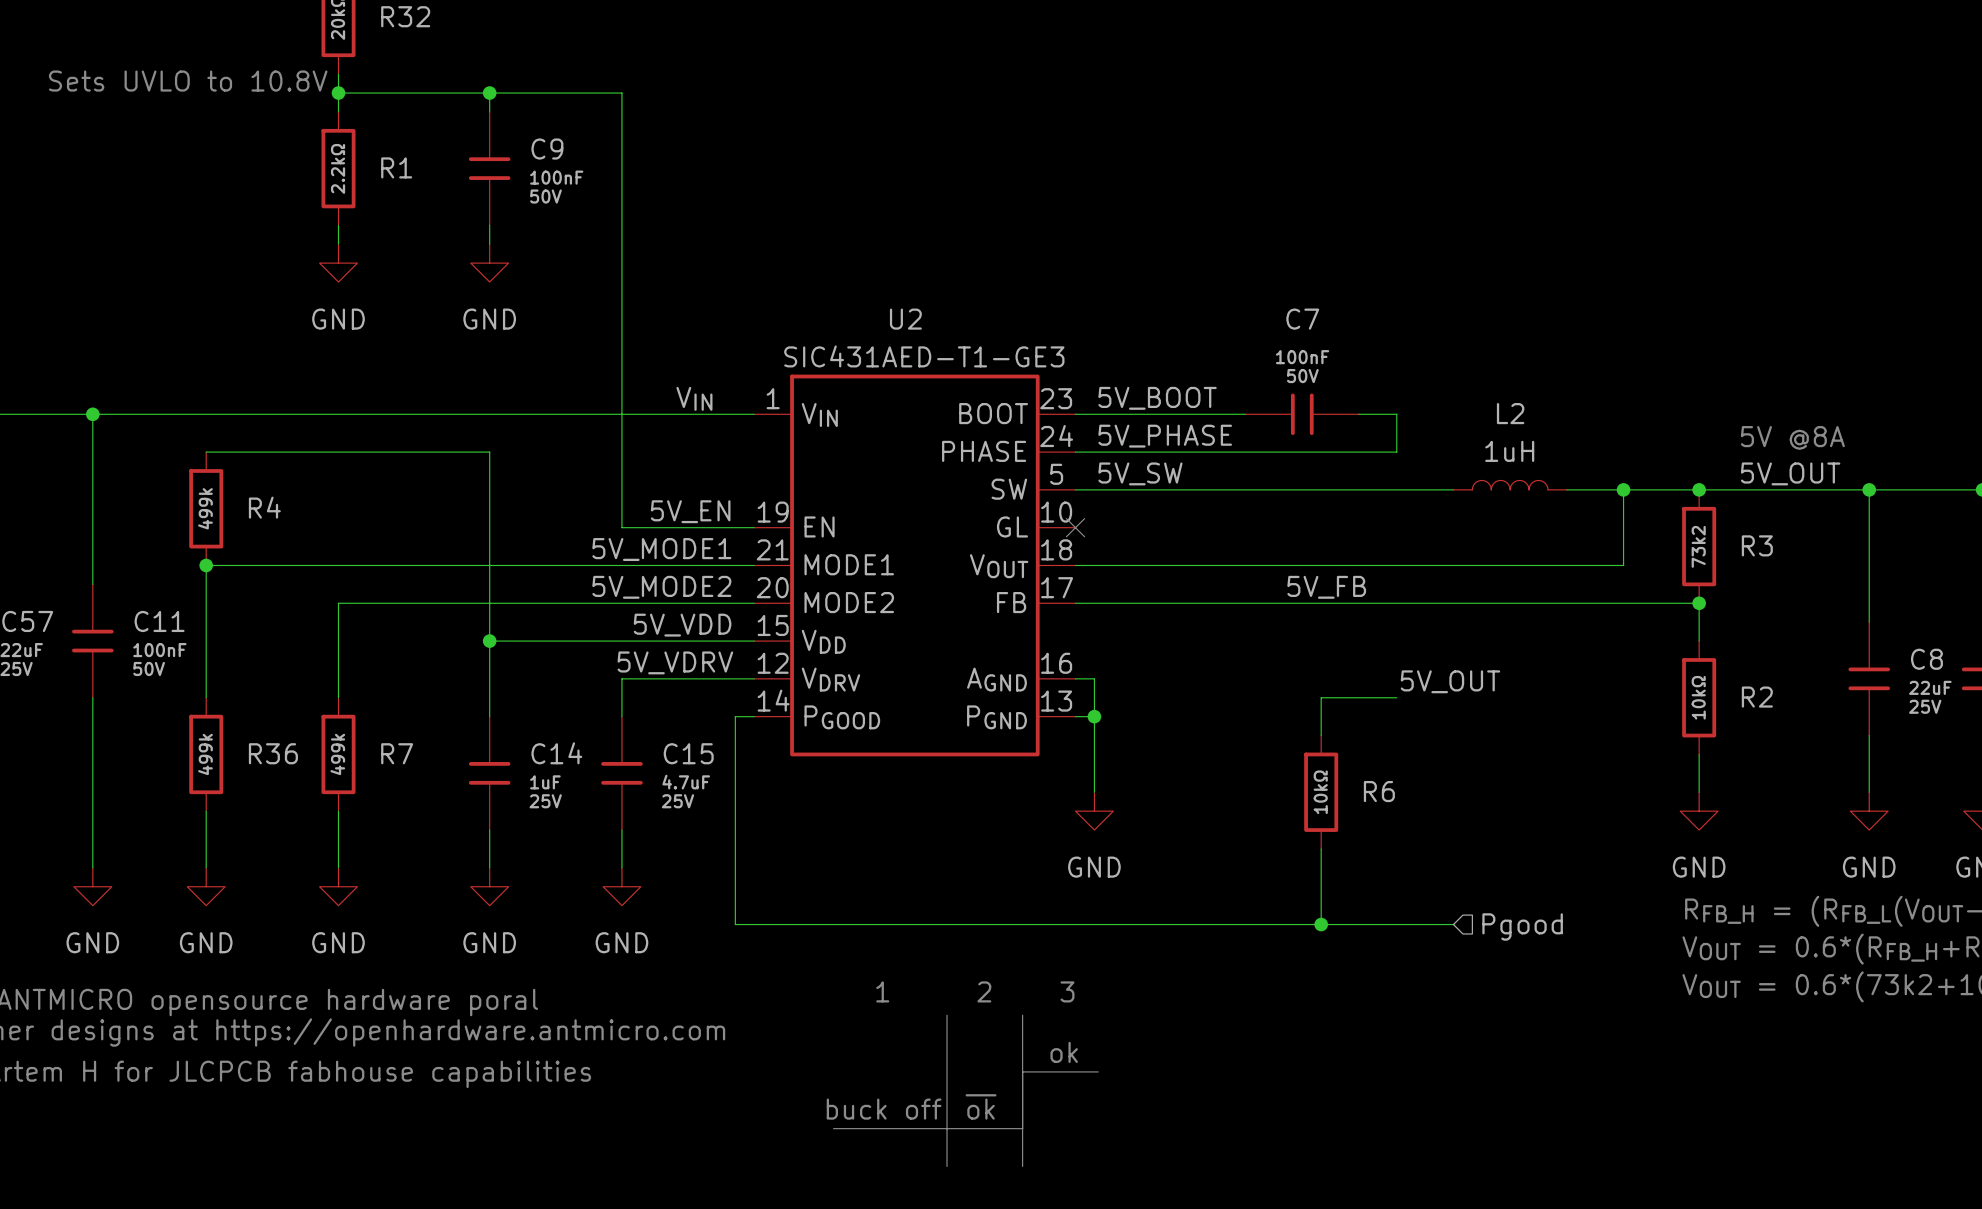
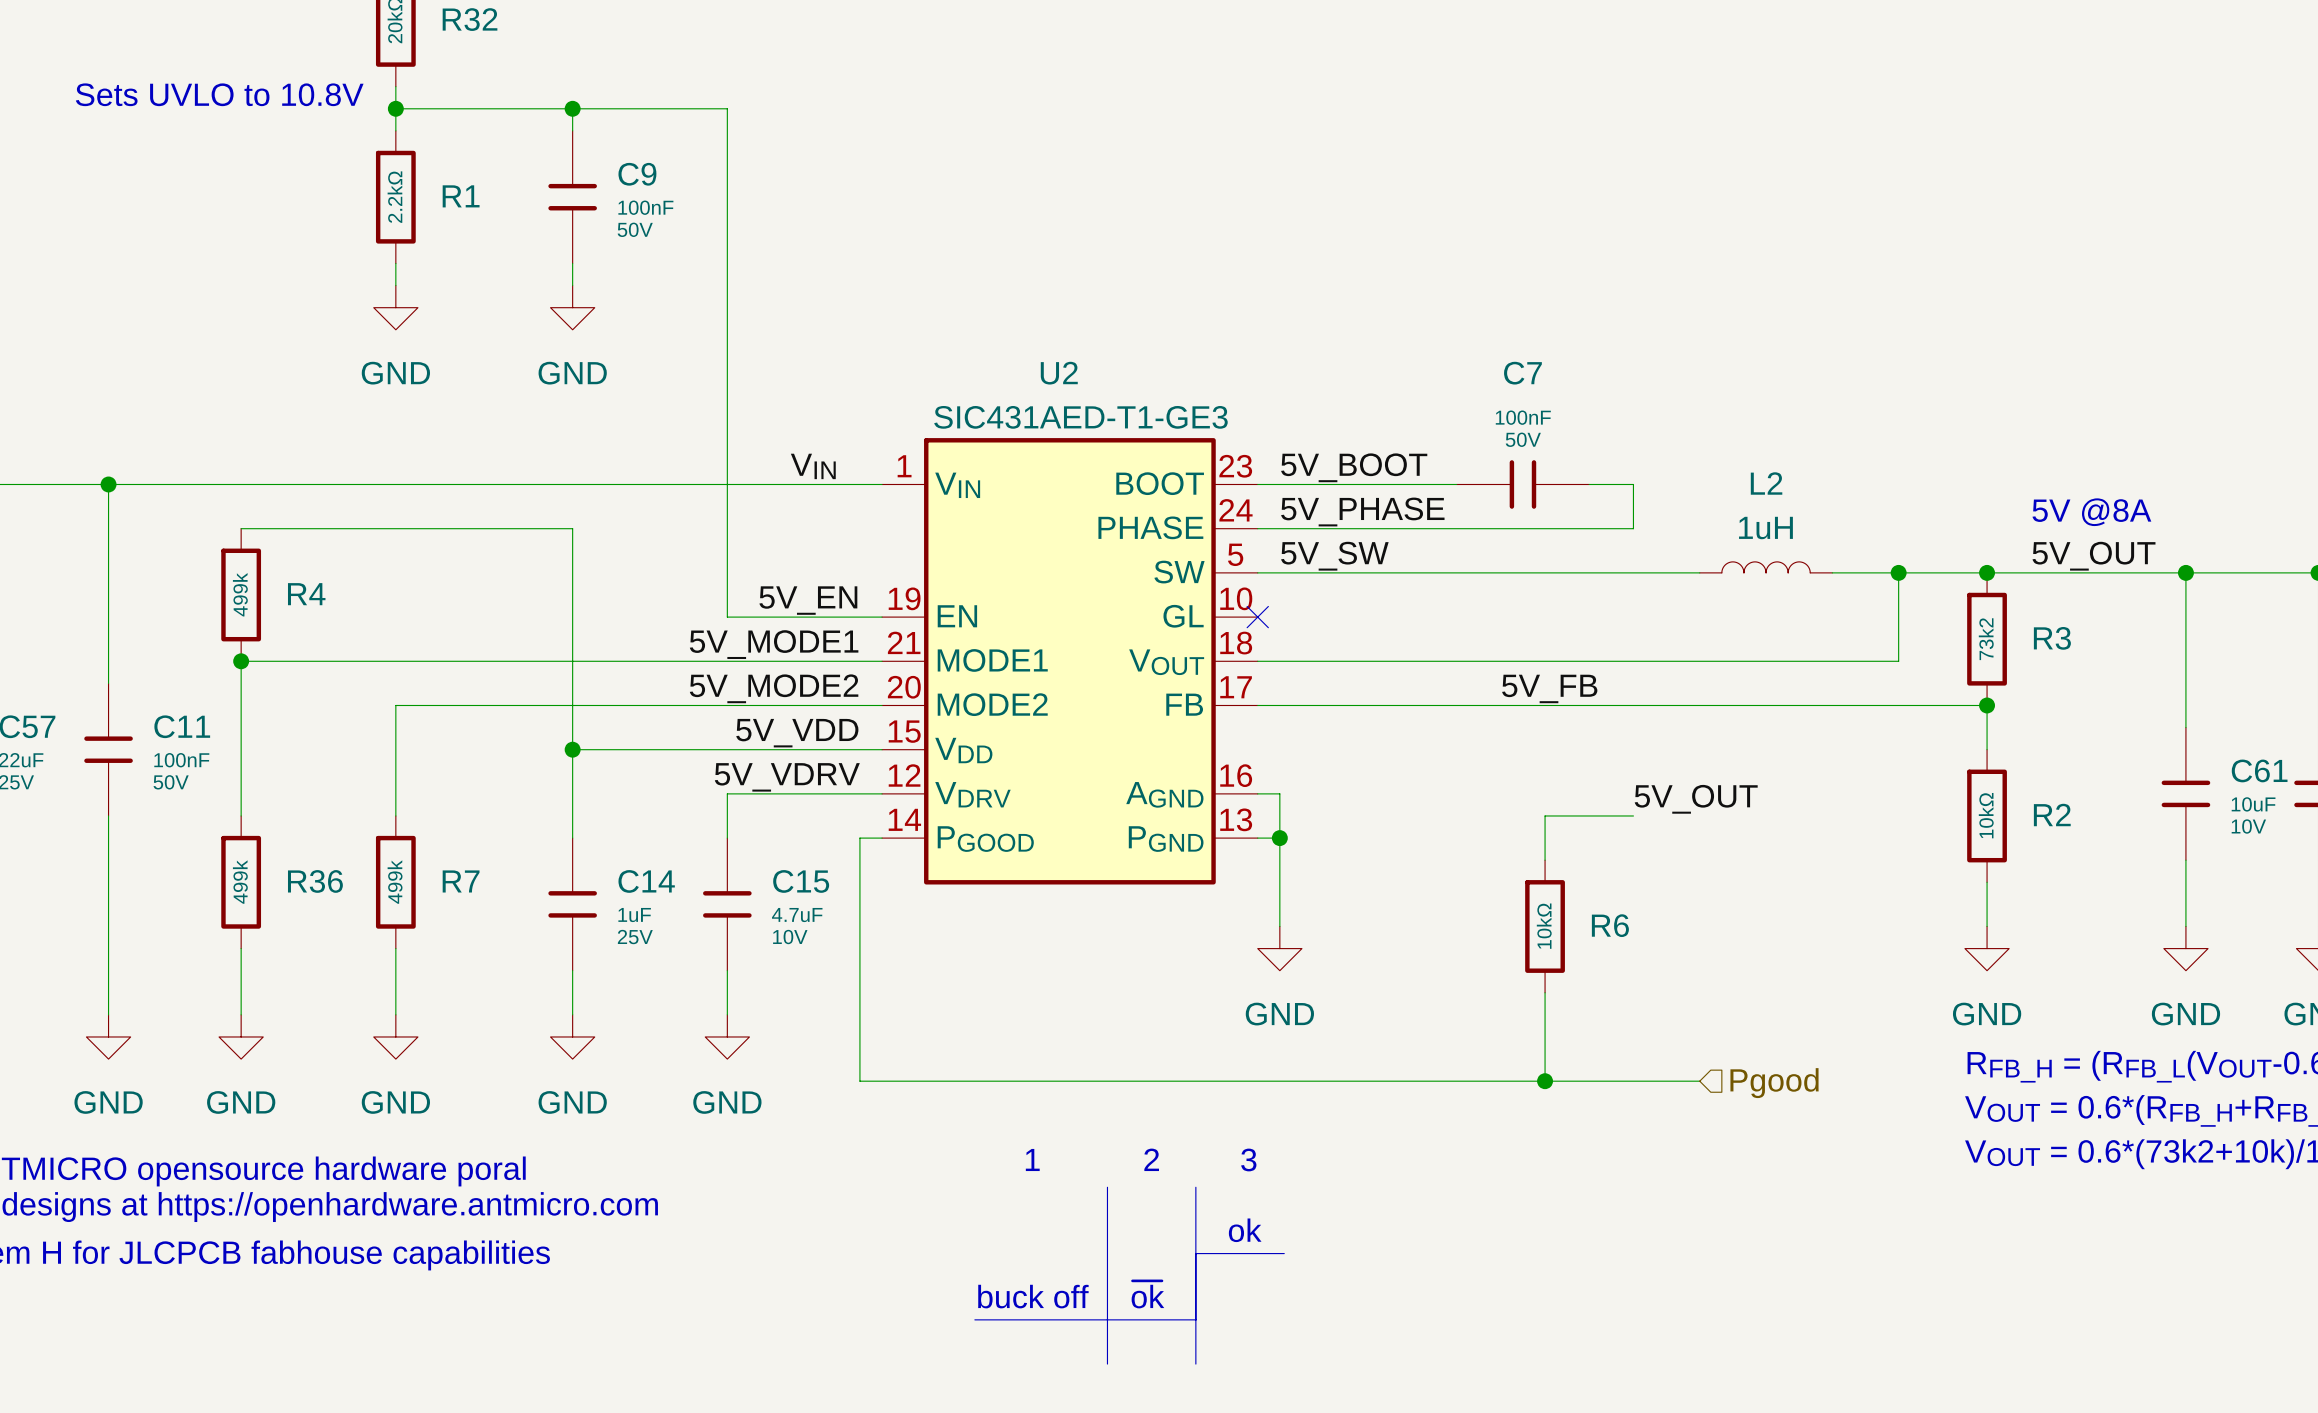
C8 name: C8 (1926, 659) -> C61 (2259, 770)
C8 value: 22uF (1930, 687) -> 10uF (2253, 804)
C8 text: 25V (1925, 706) -> 10V (2248, 826)
C15 text: 25V (677, 801) -> 10V (790, 937)

